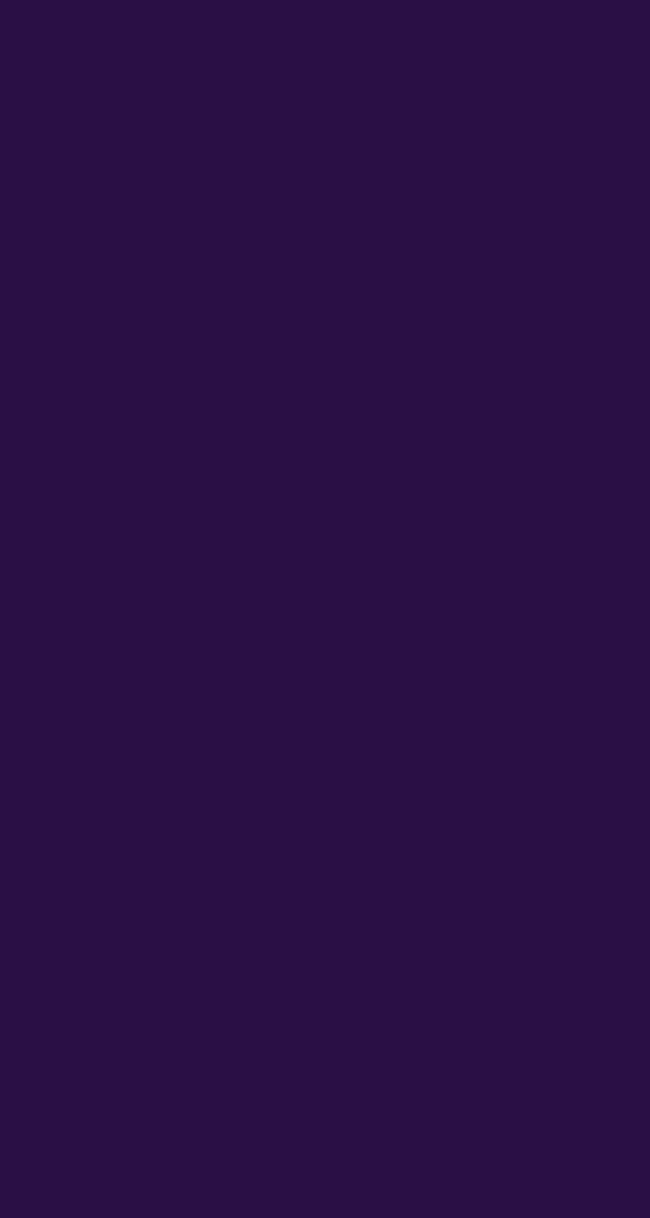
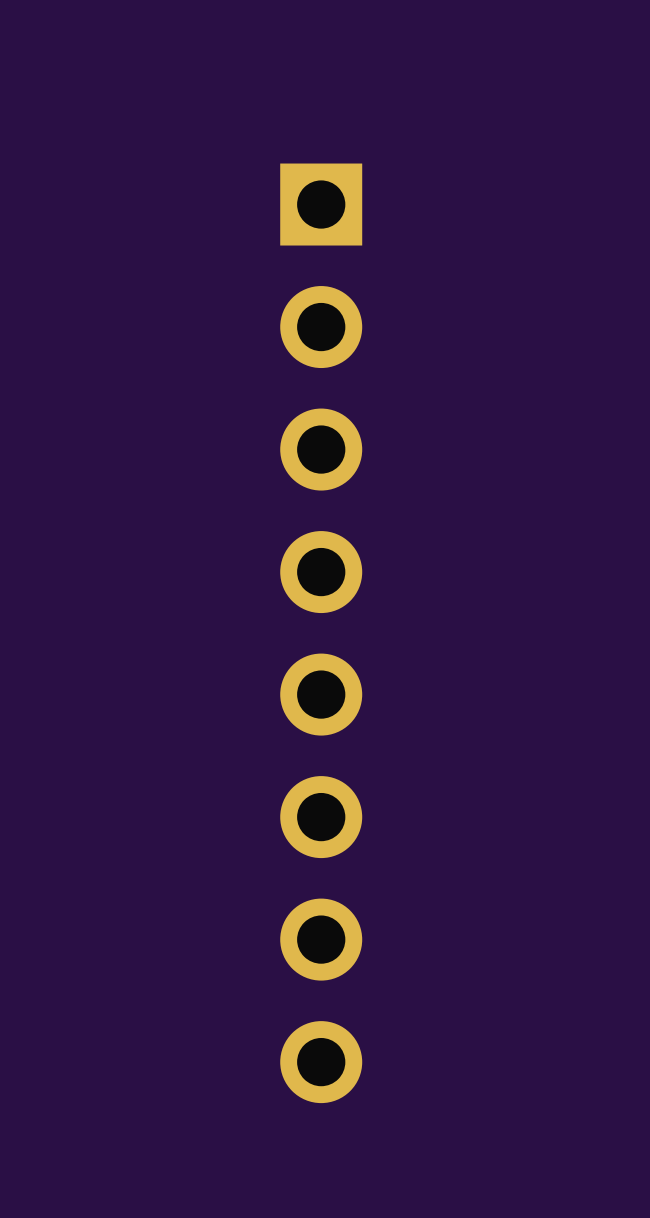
part: none -> (321, 633)

